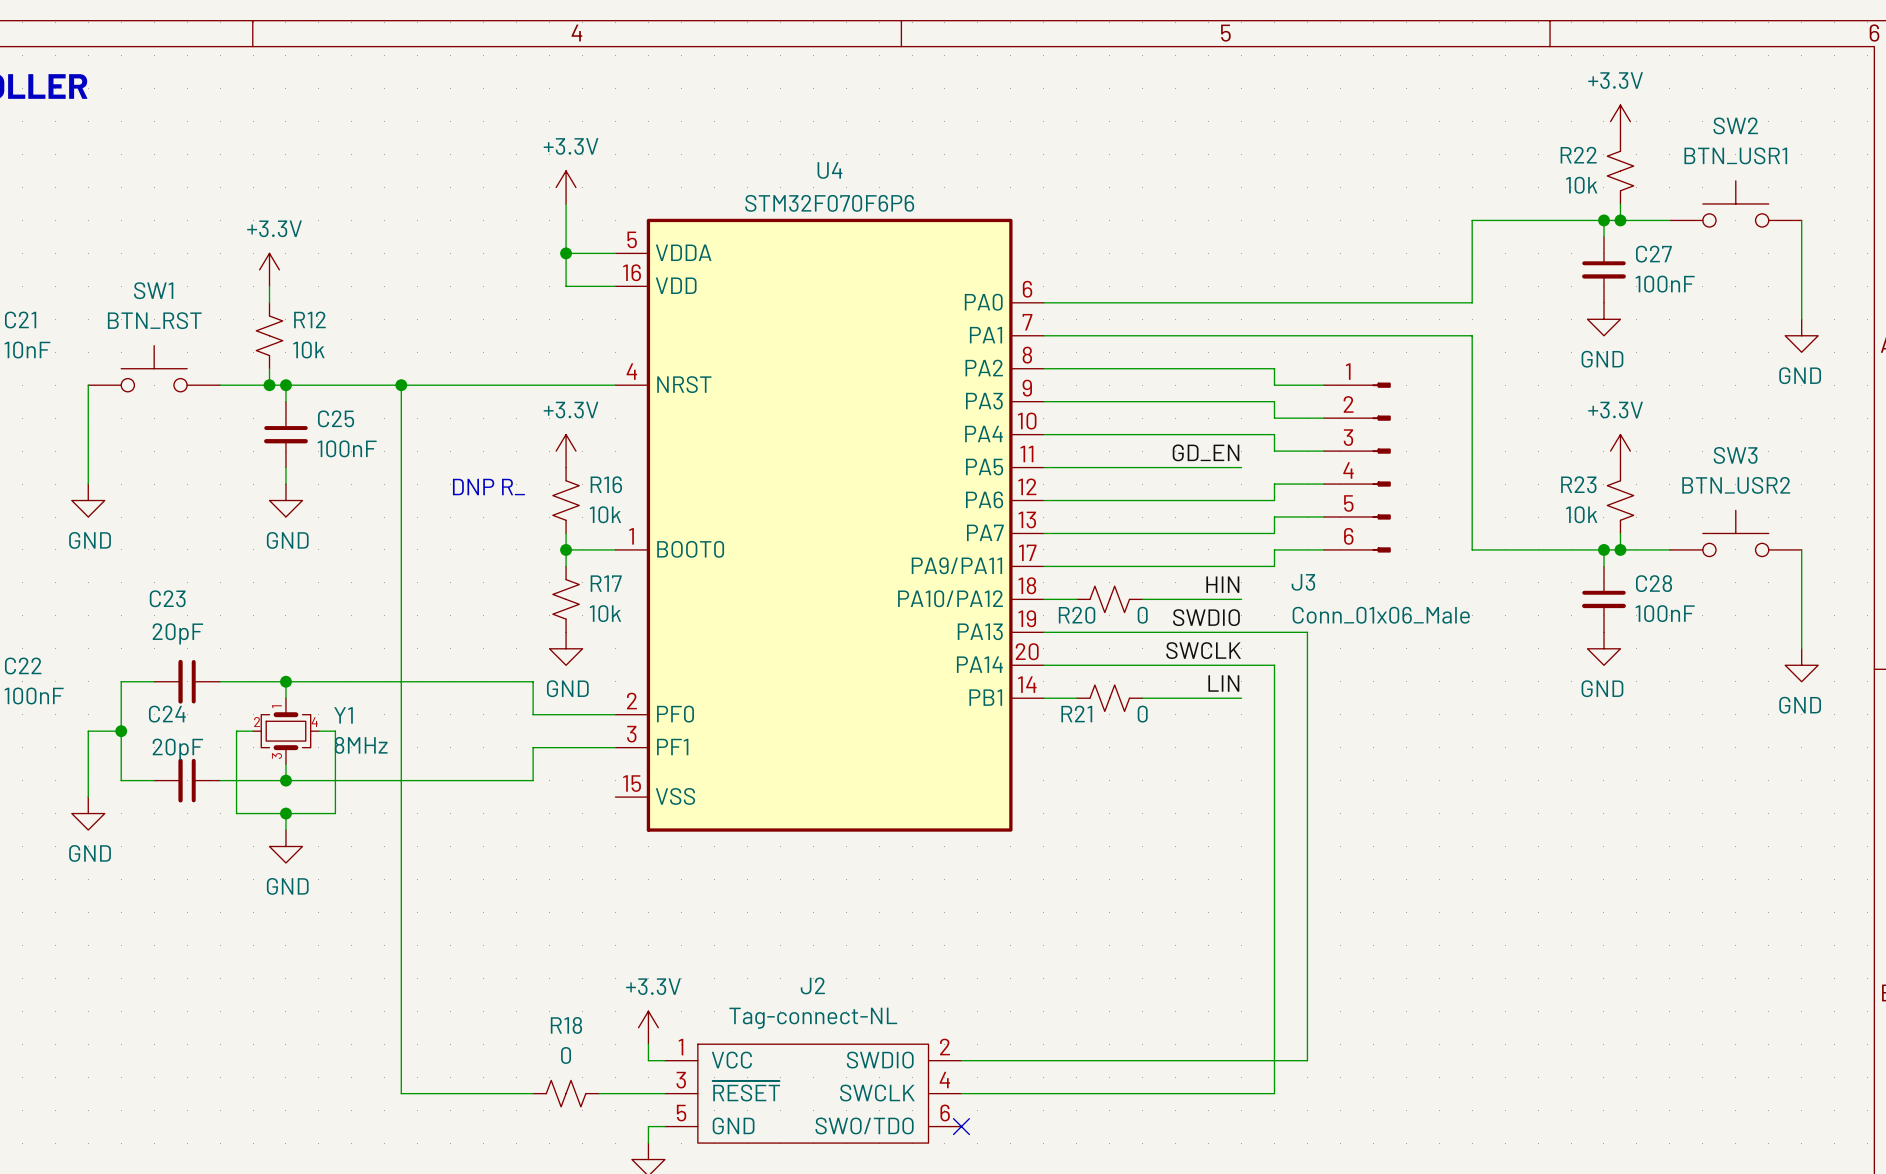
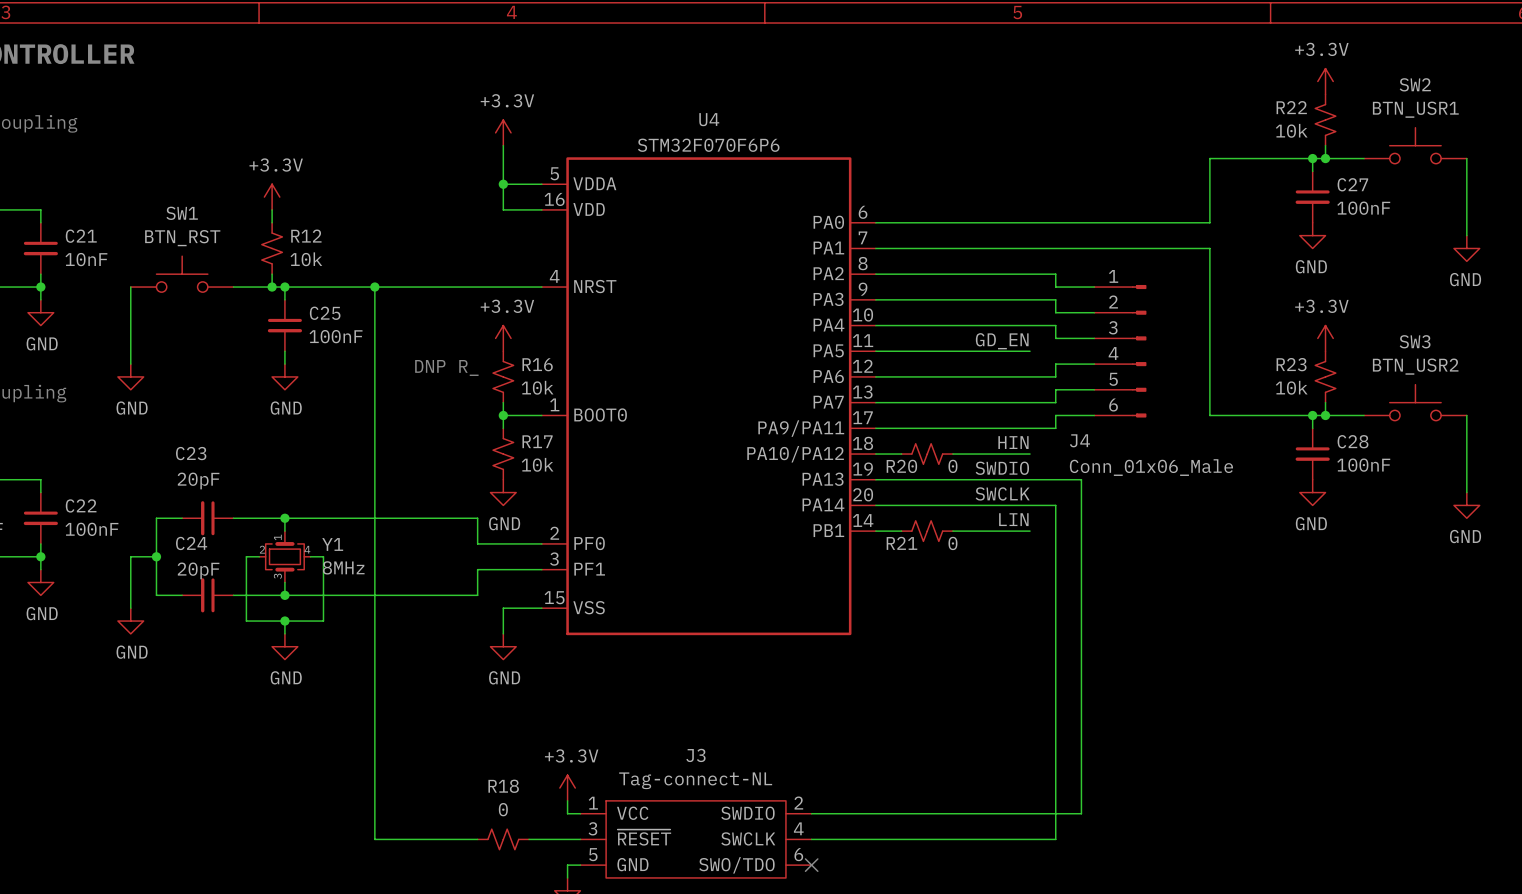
J3 name: J3 (1303, 582) -> J4 (1079, 440)
wire: none -> (541, 608) (503, 608) (503, 633)
power symbol: none -> GND (503, 646)
J2 name: J2 (812, 985) -> J3 (695, 755)

